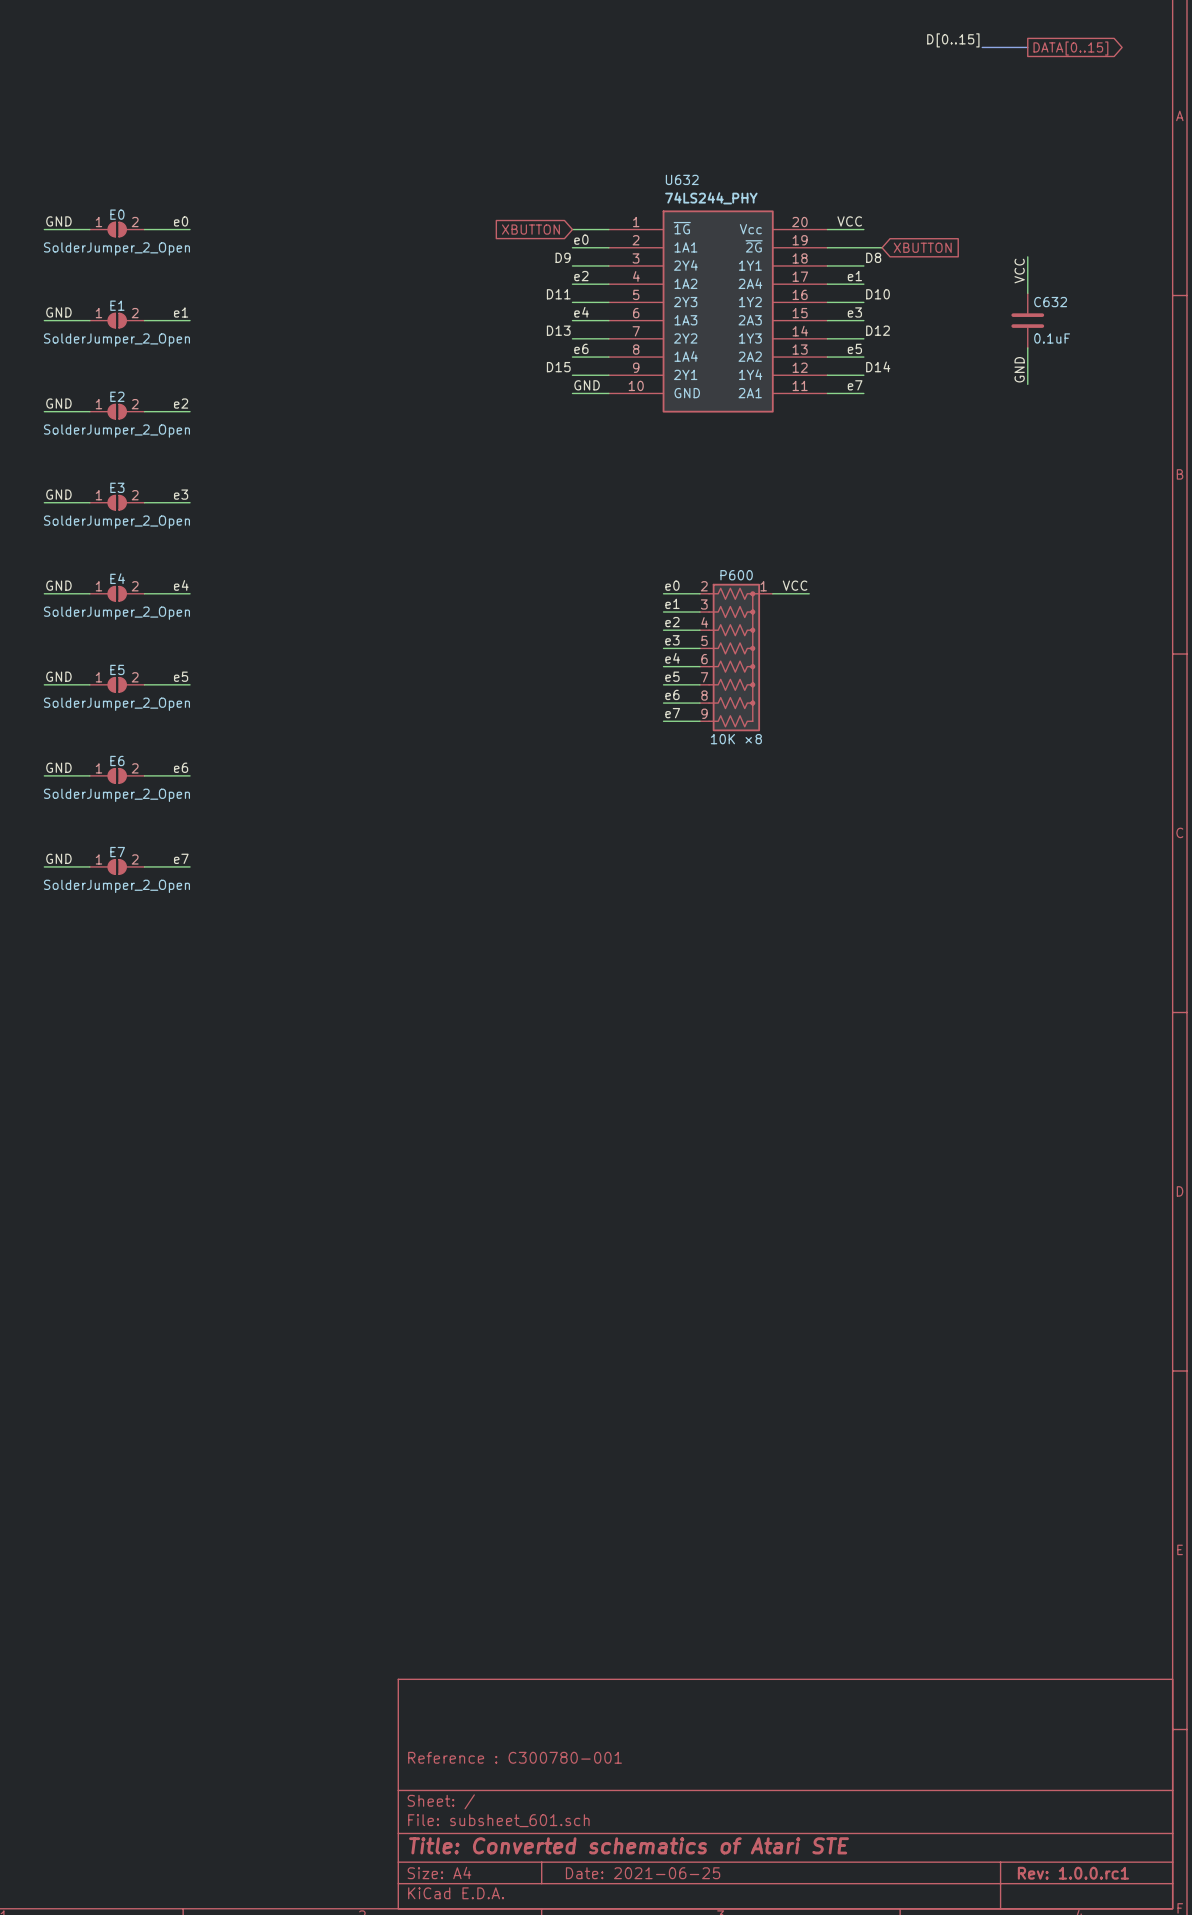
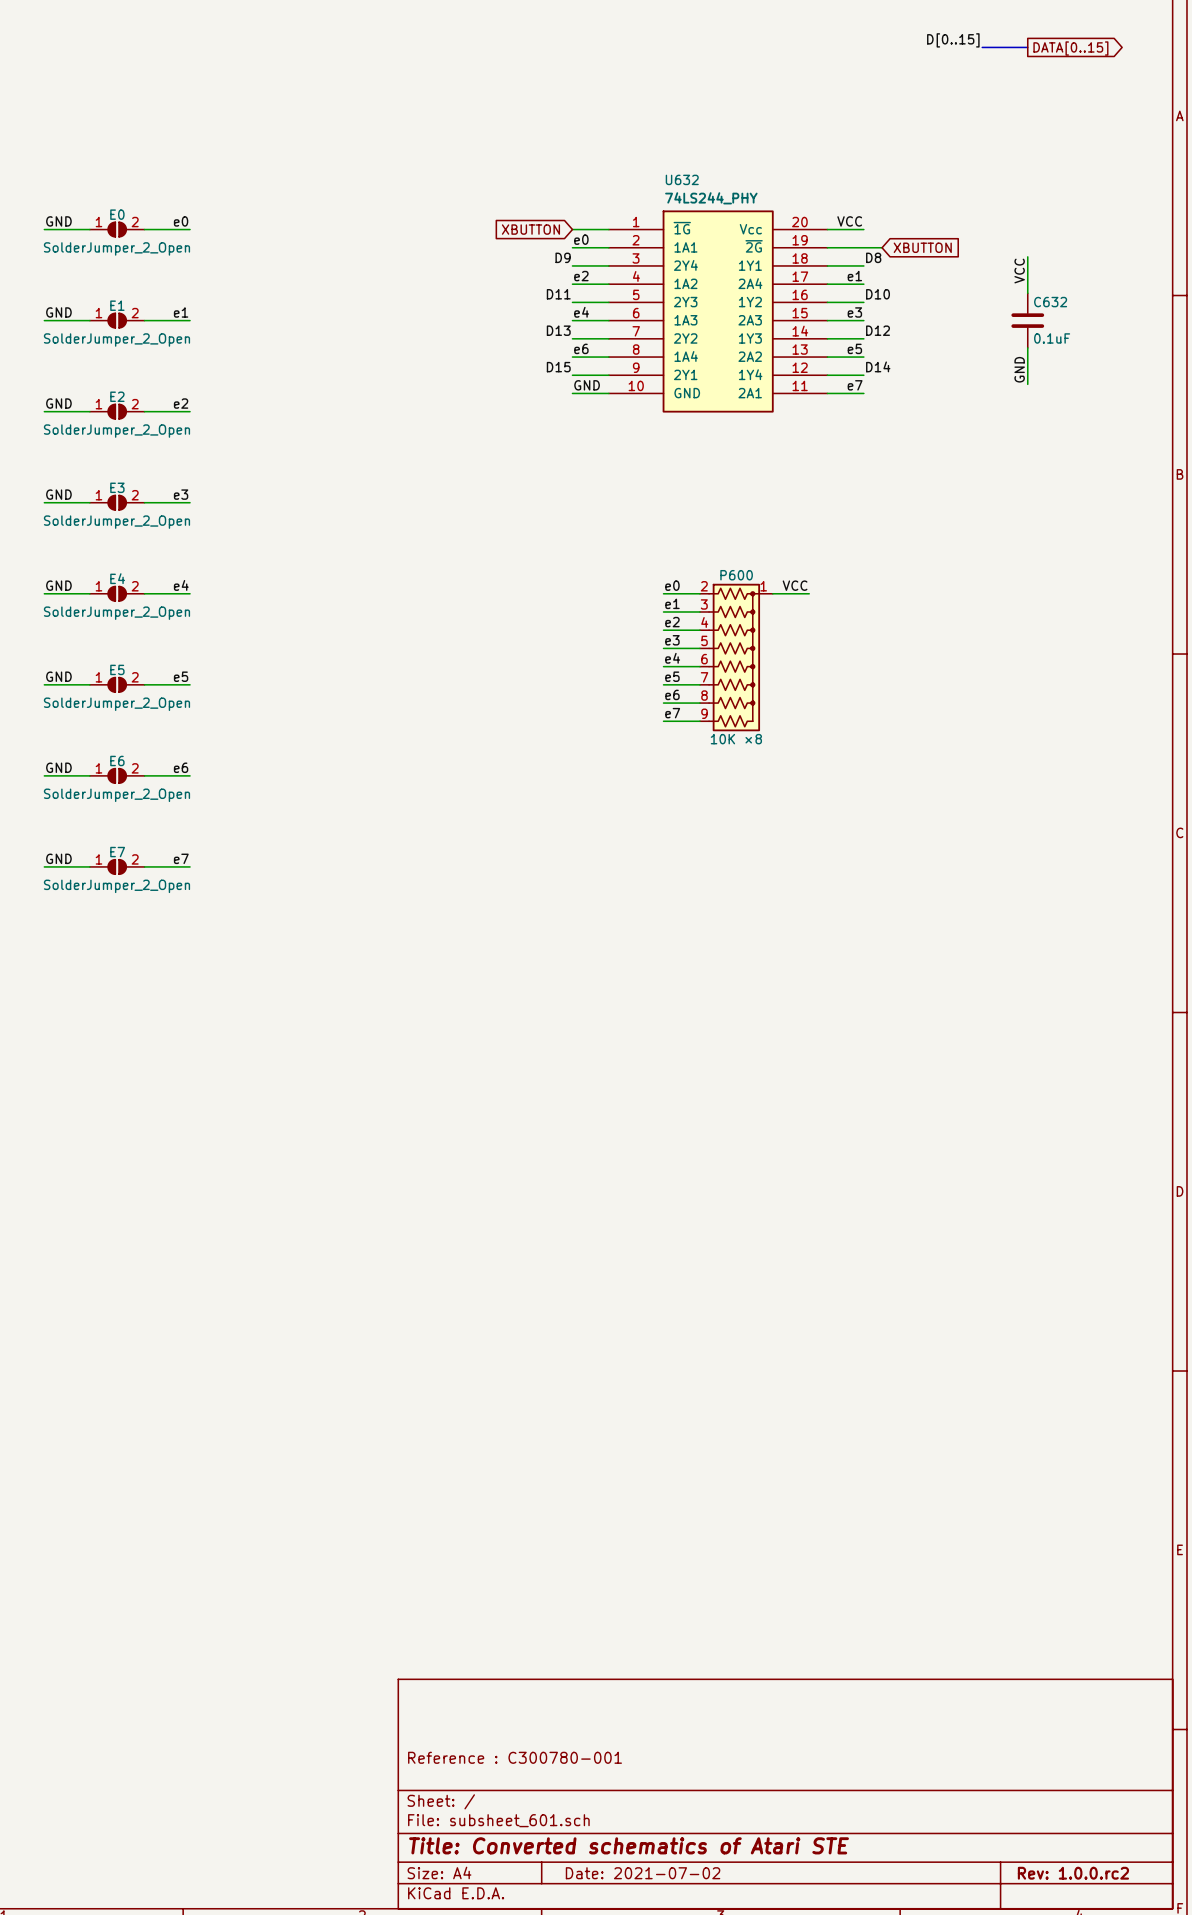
title block: Date: 2021-06-25 (643, 1873) -> Date: 2021-07-02 (643, 1873)
title block: Rev: 1.0.0.rc1 (1073, 1873) -> Rev: 1.0.0.rc2 (1073, 1873)

